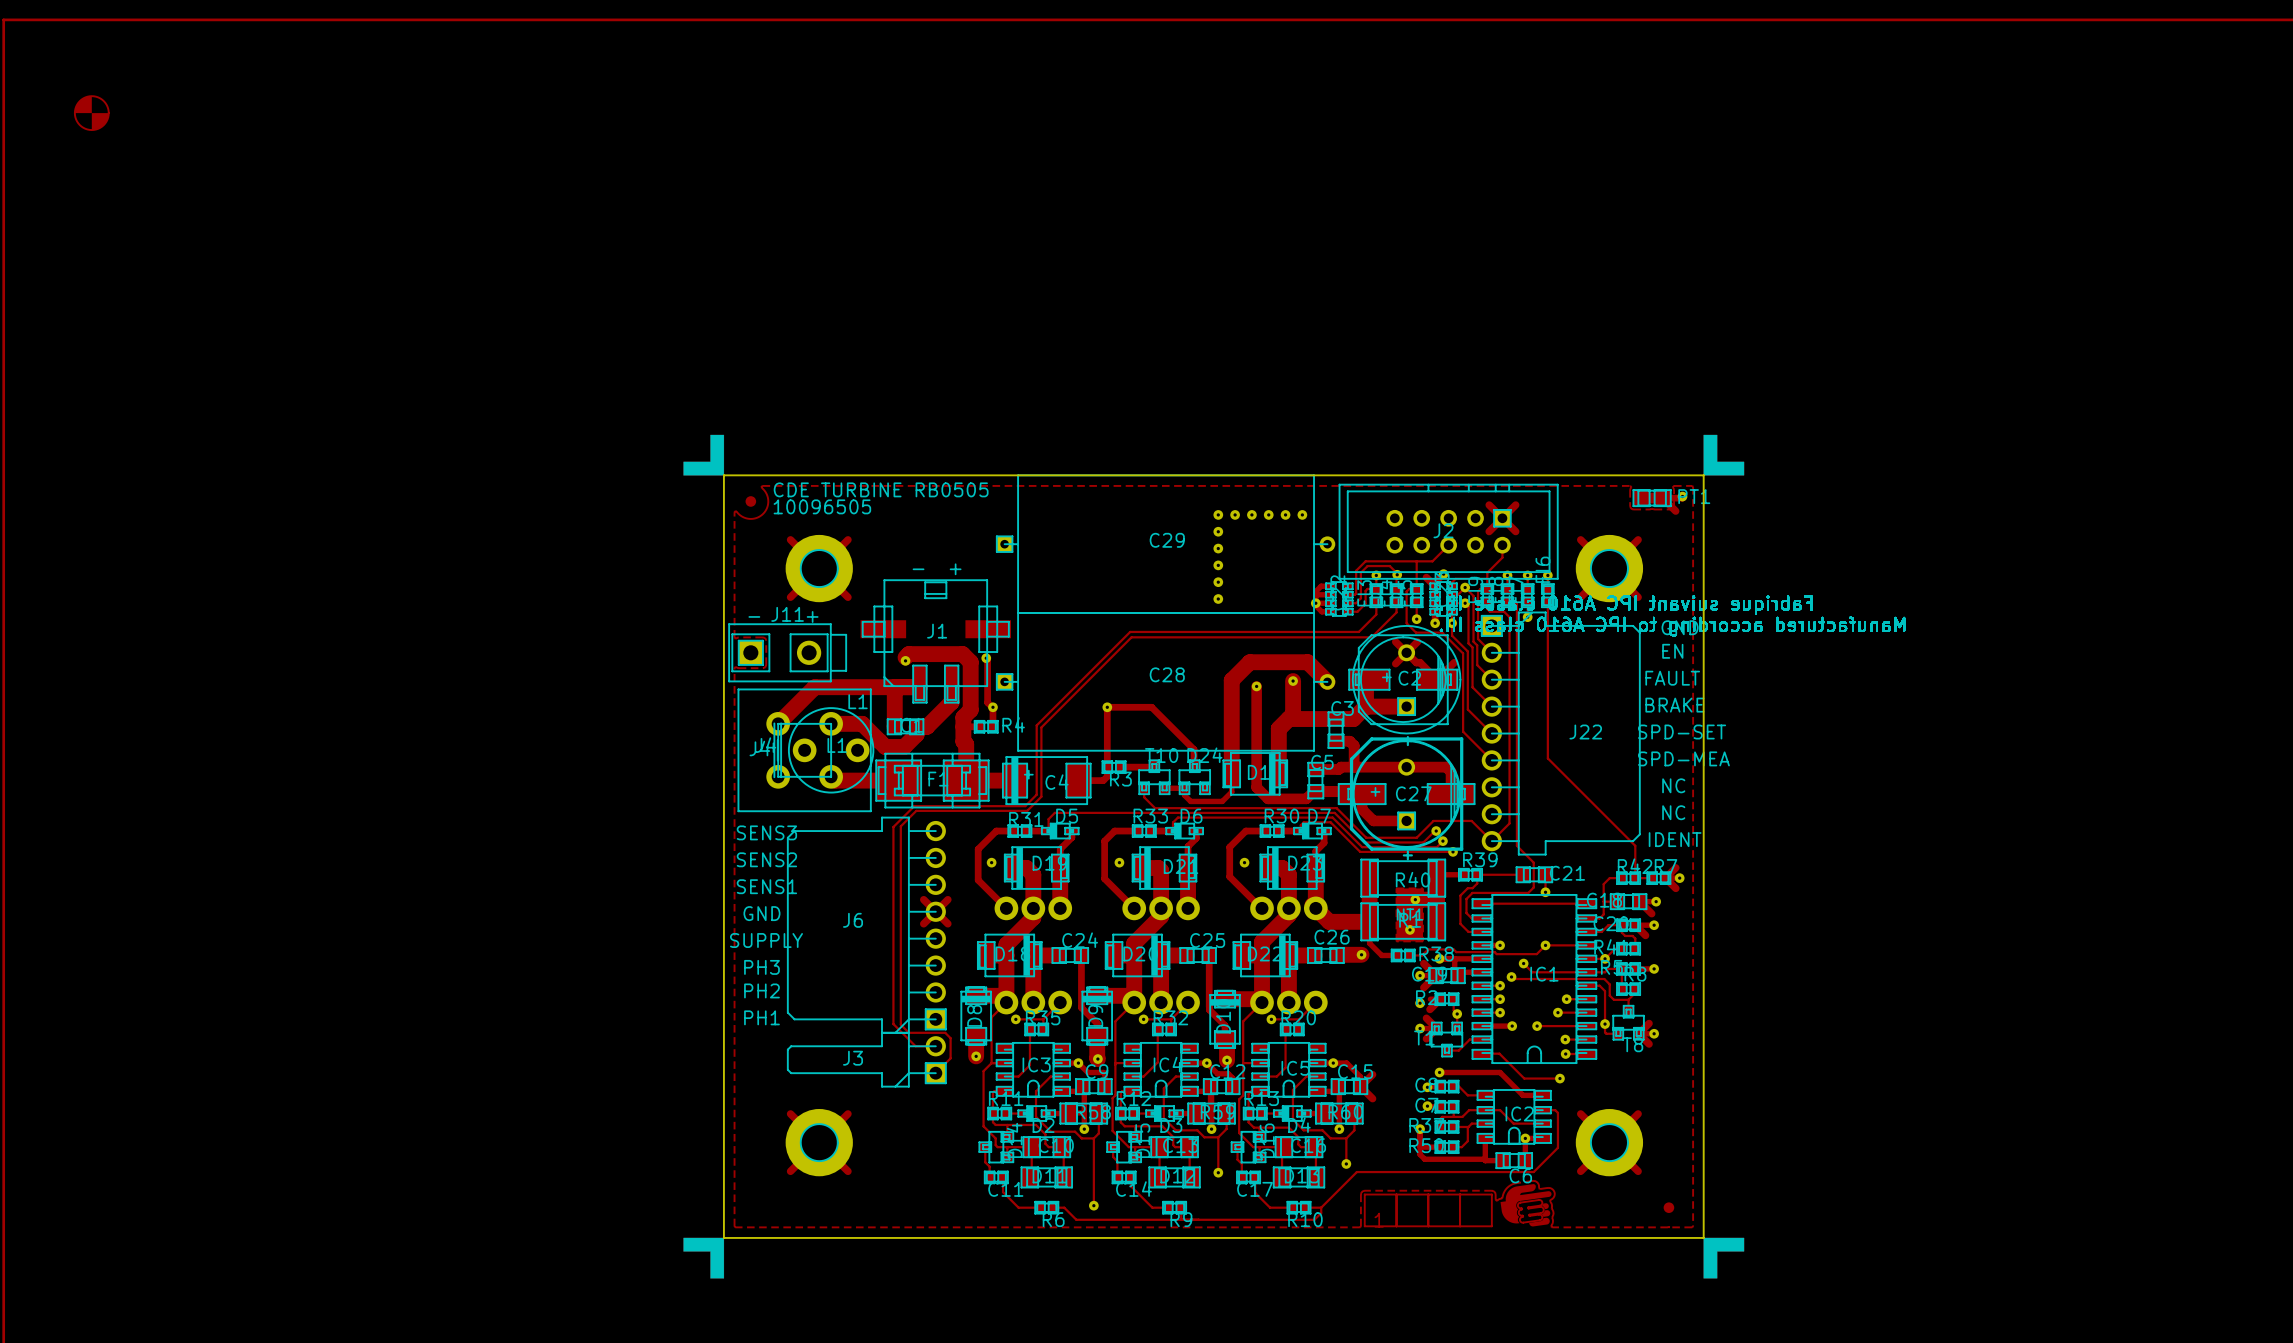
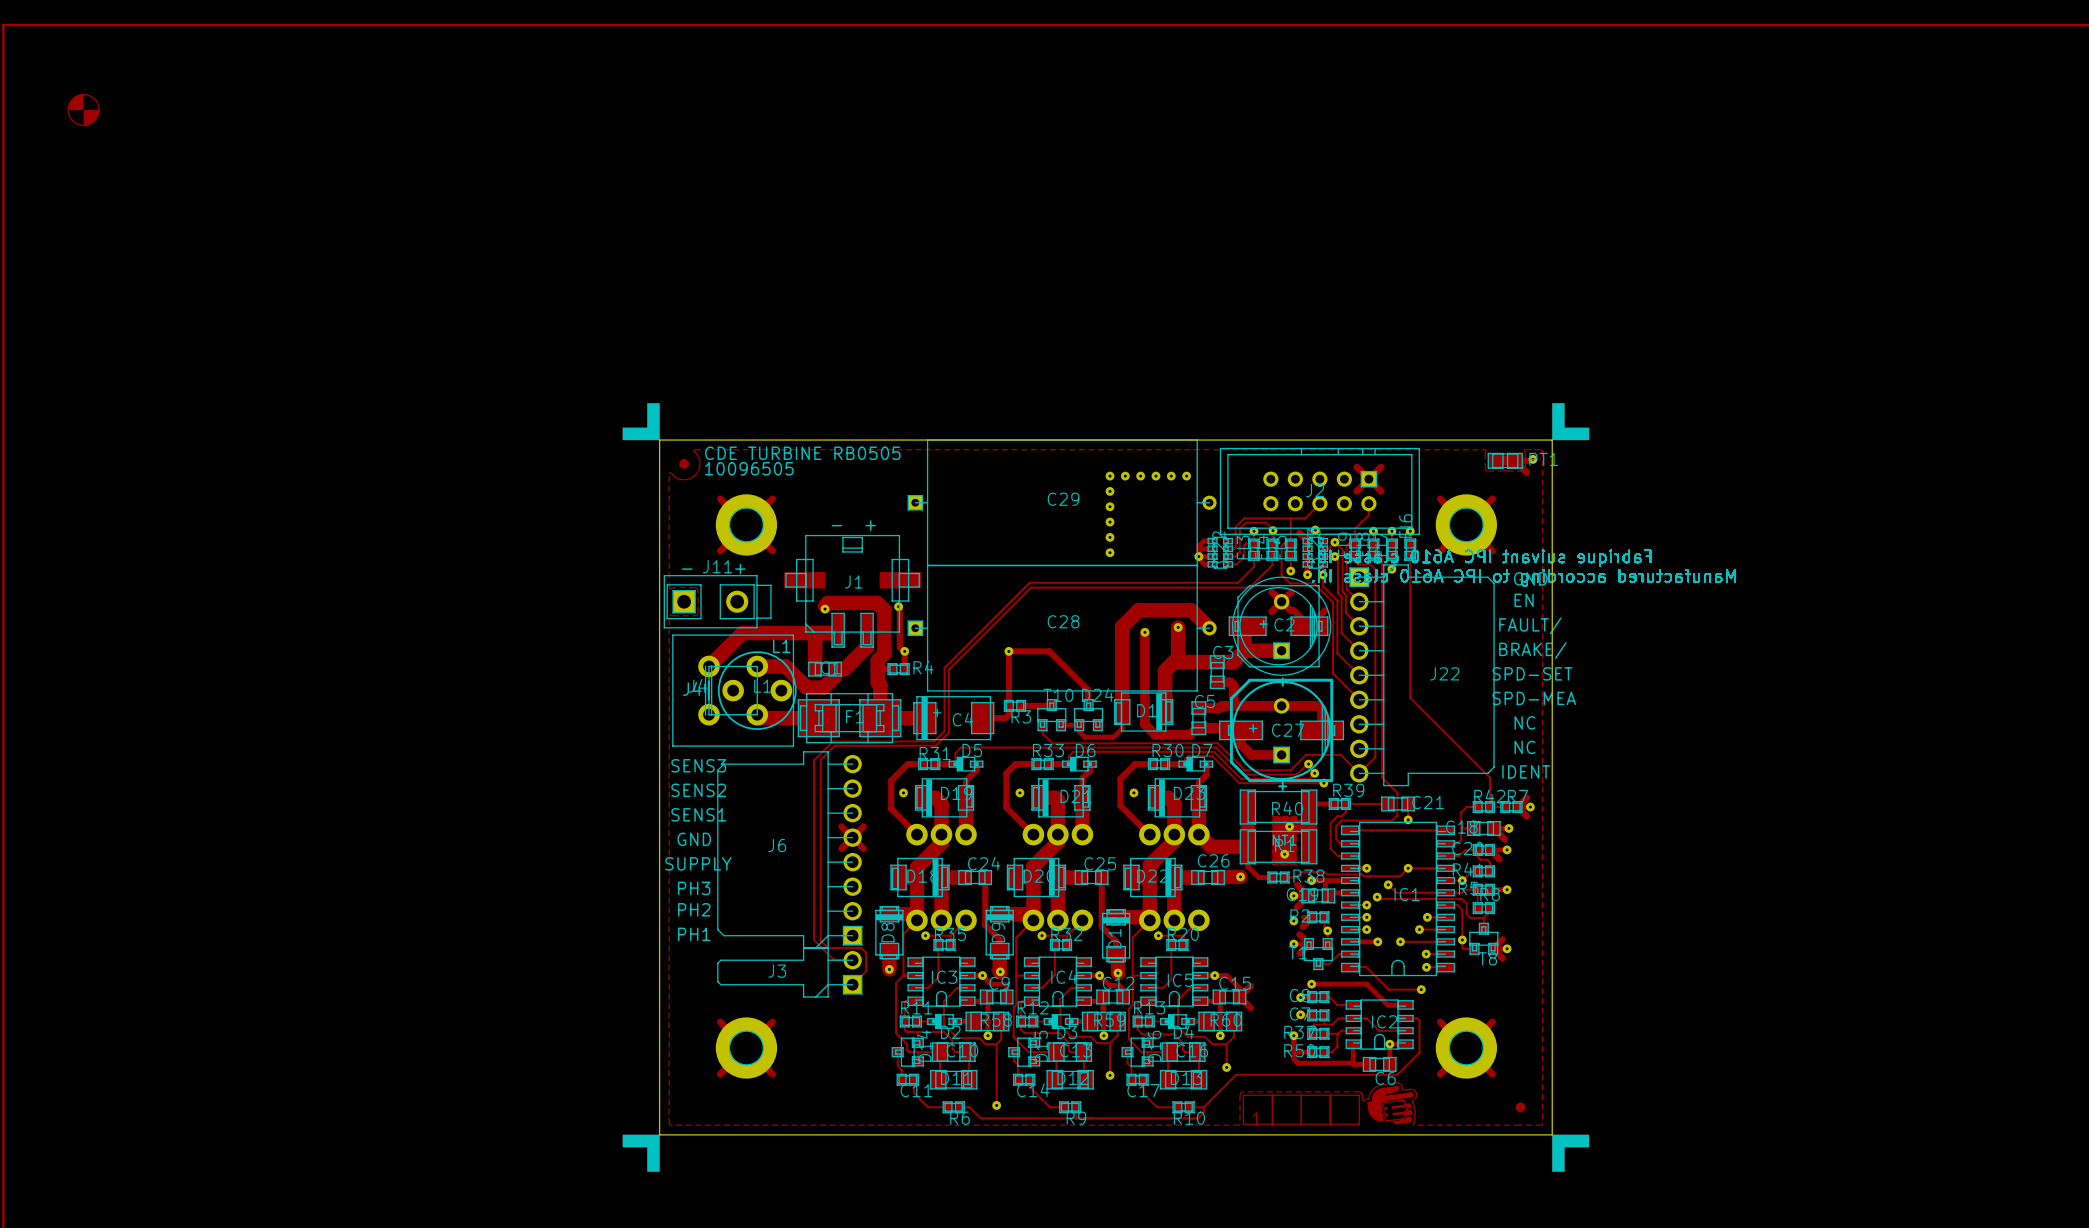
text: FAULT (1672, 678) -> FAULT/ (1530, 626)
text: BRAKE (1674, 705) -> BRAKE/ (1532, 650)

